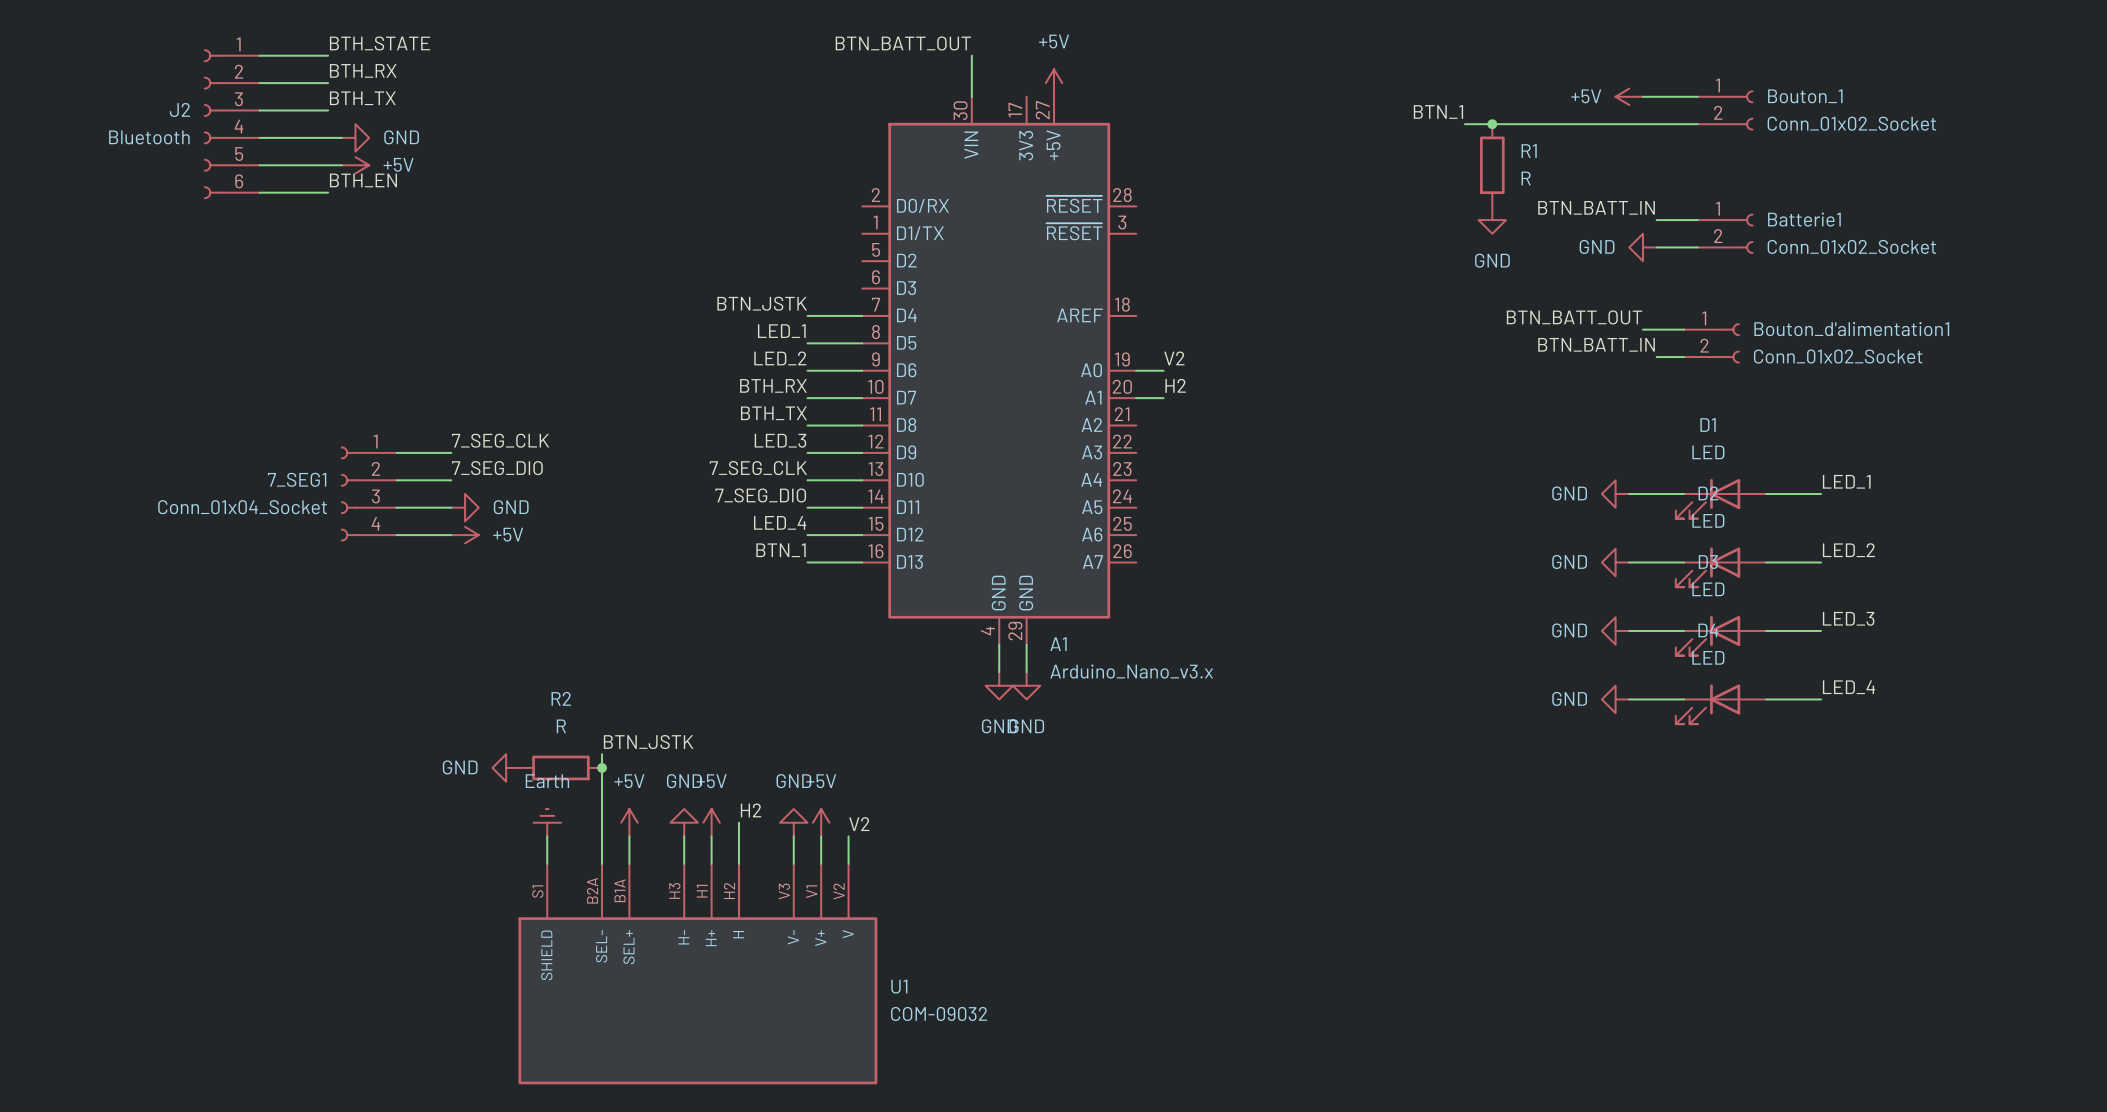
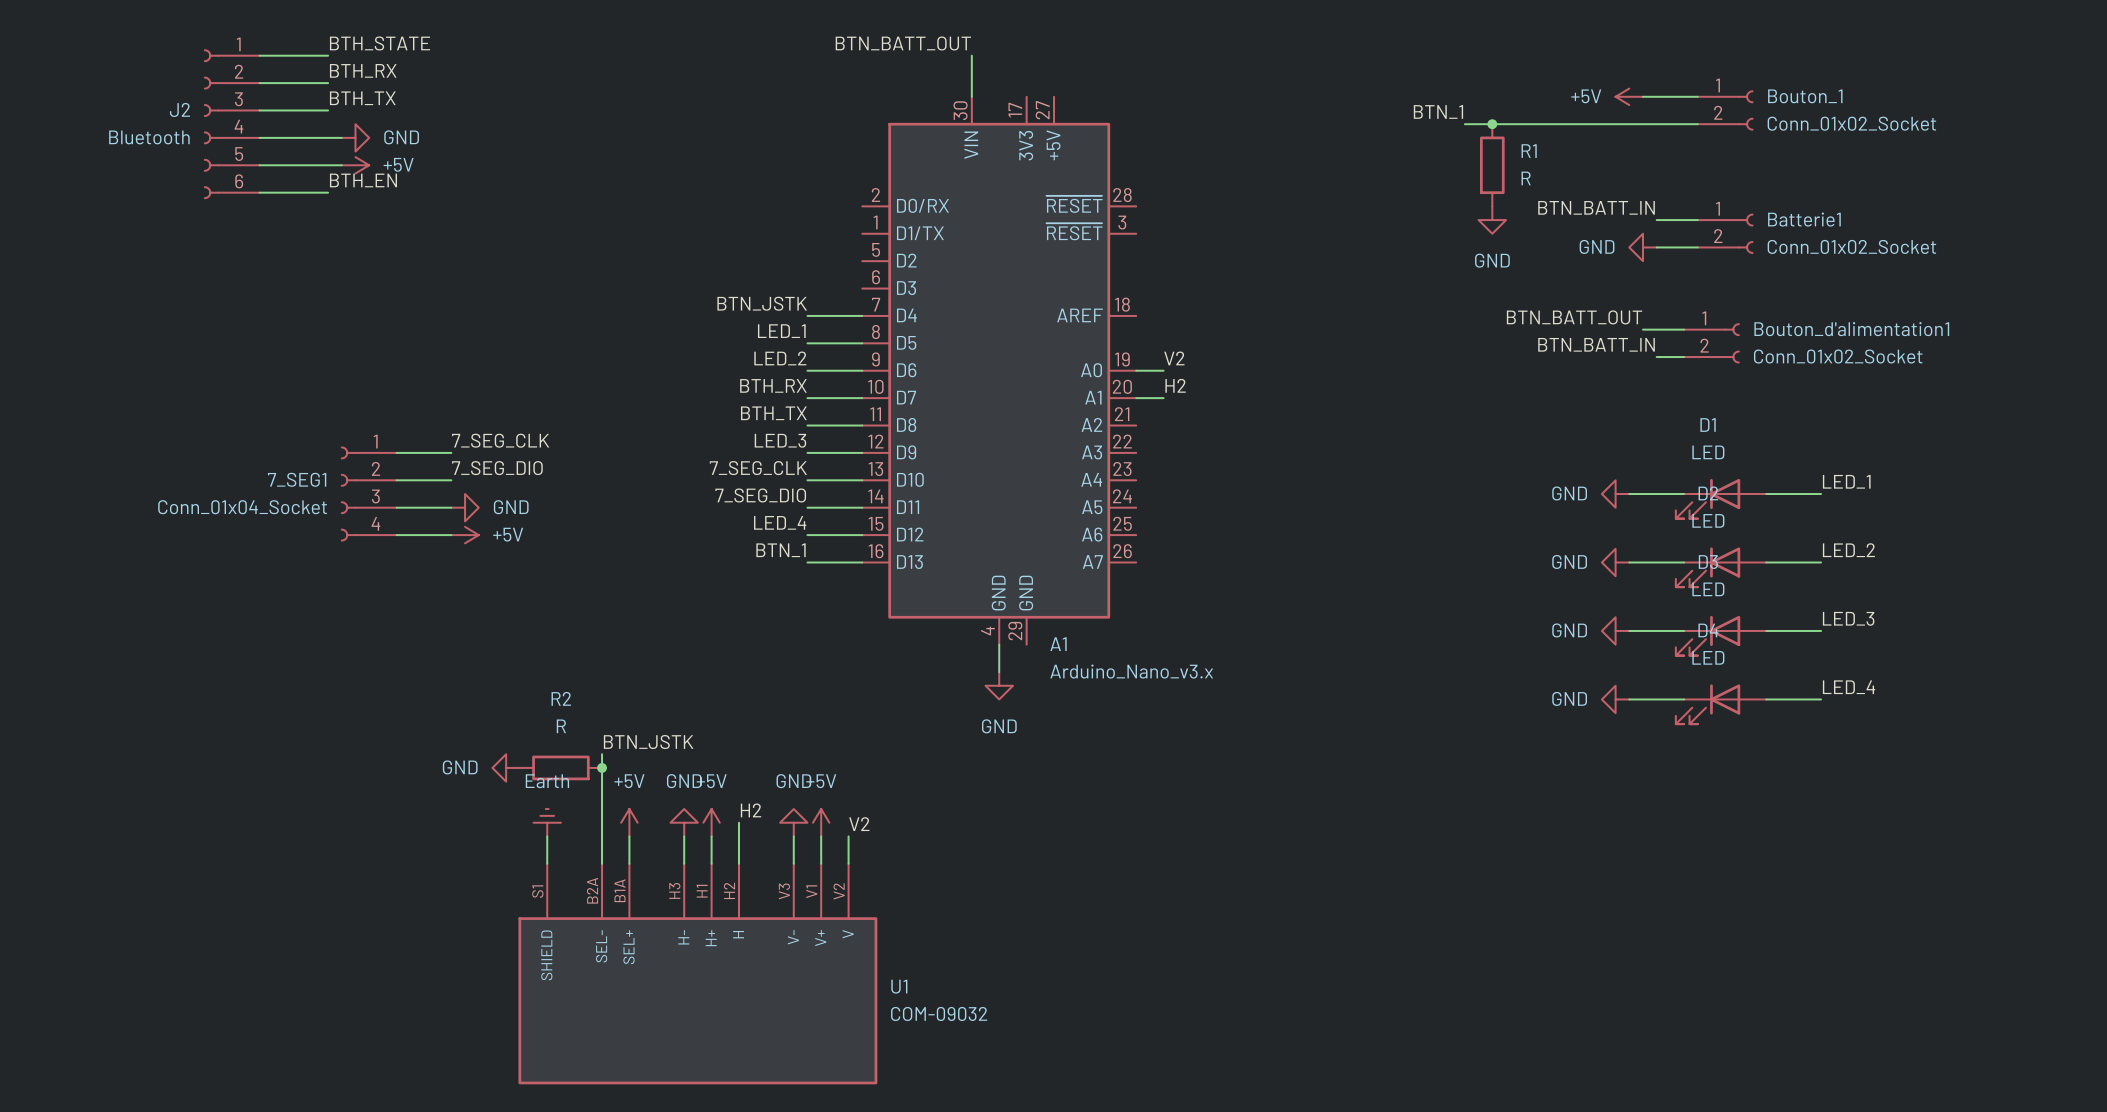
power symbol: +5V (1054, 83) -> none
wire: (1026, 644) (1026, 672) -> none
power symbol: GND (1026, 685) -> none

